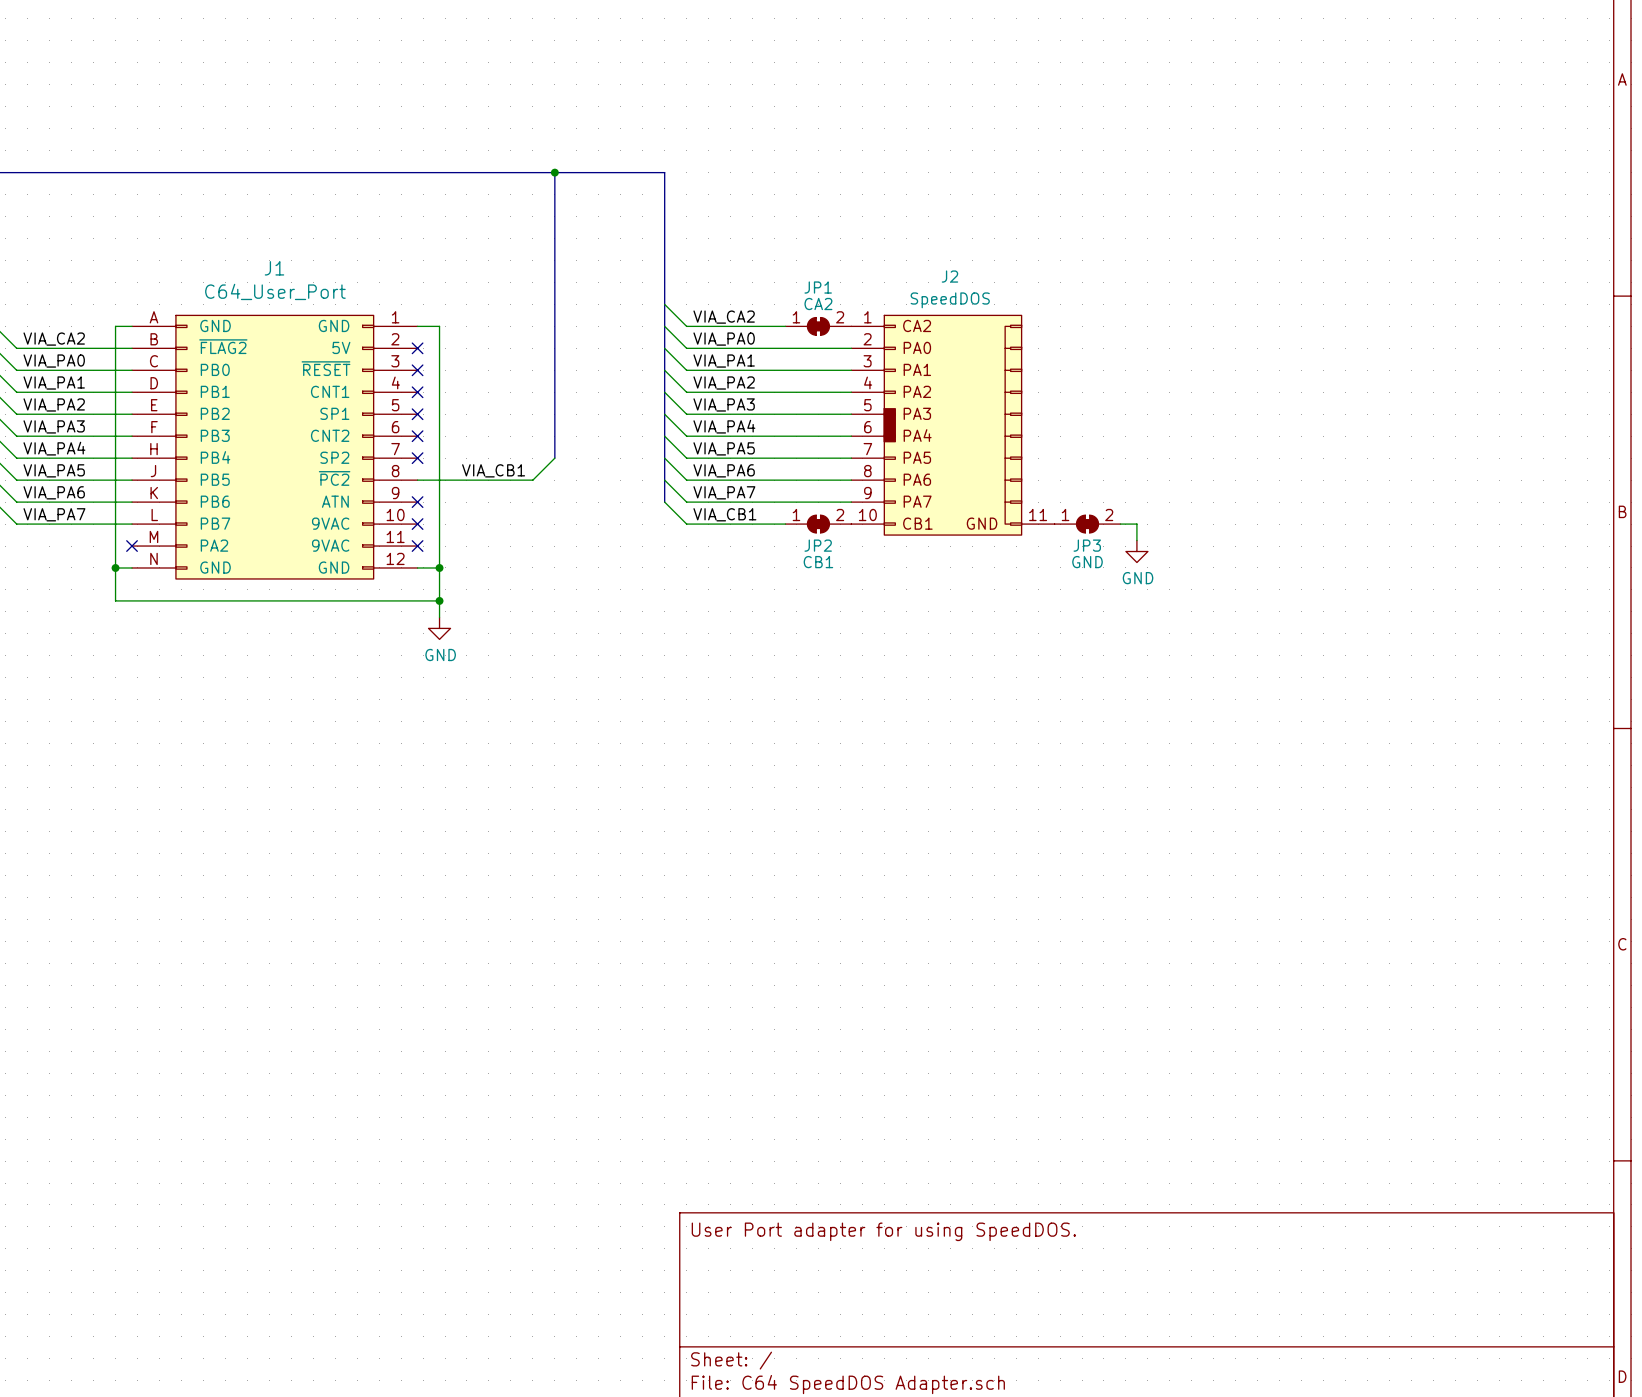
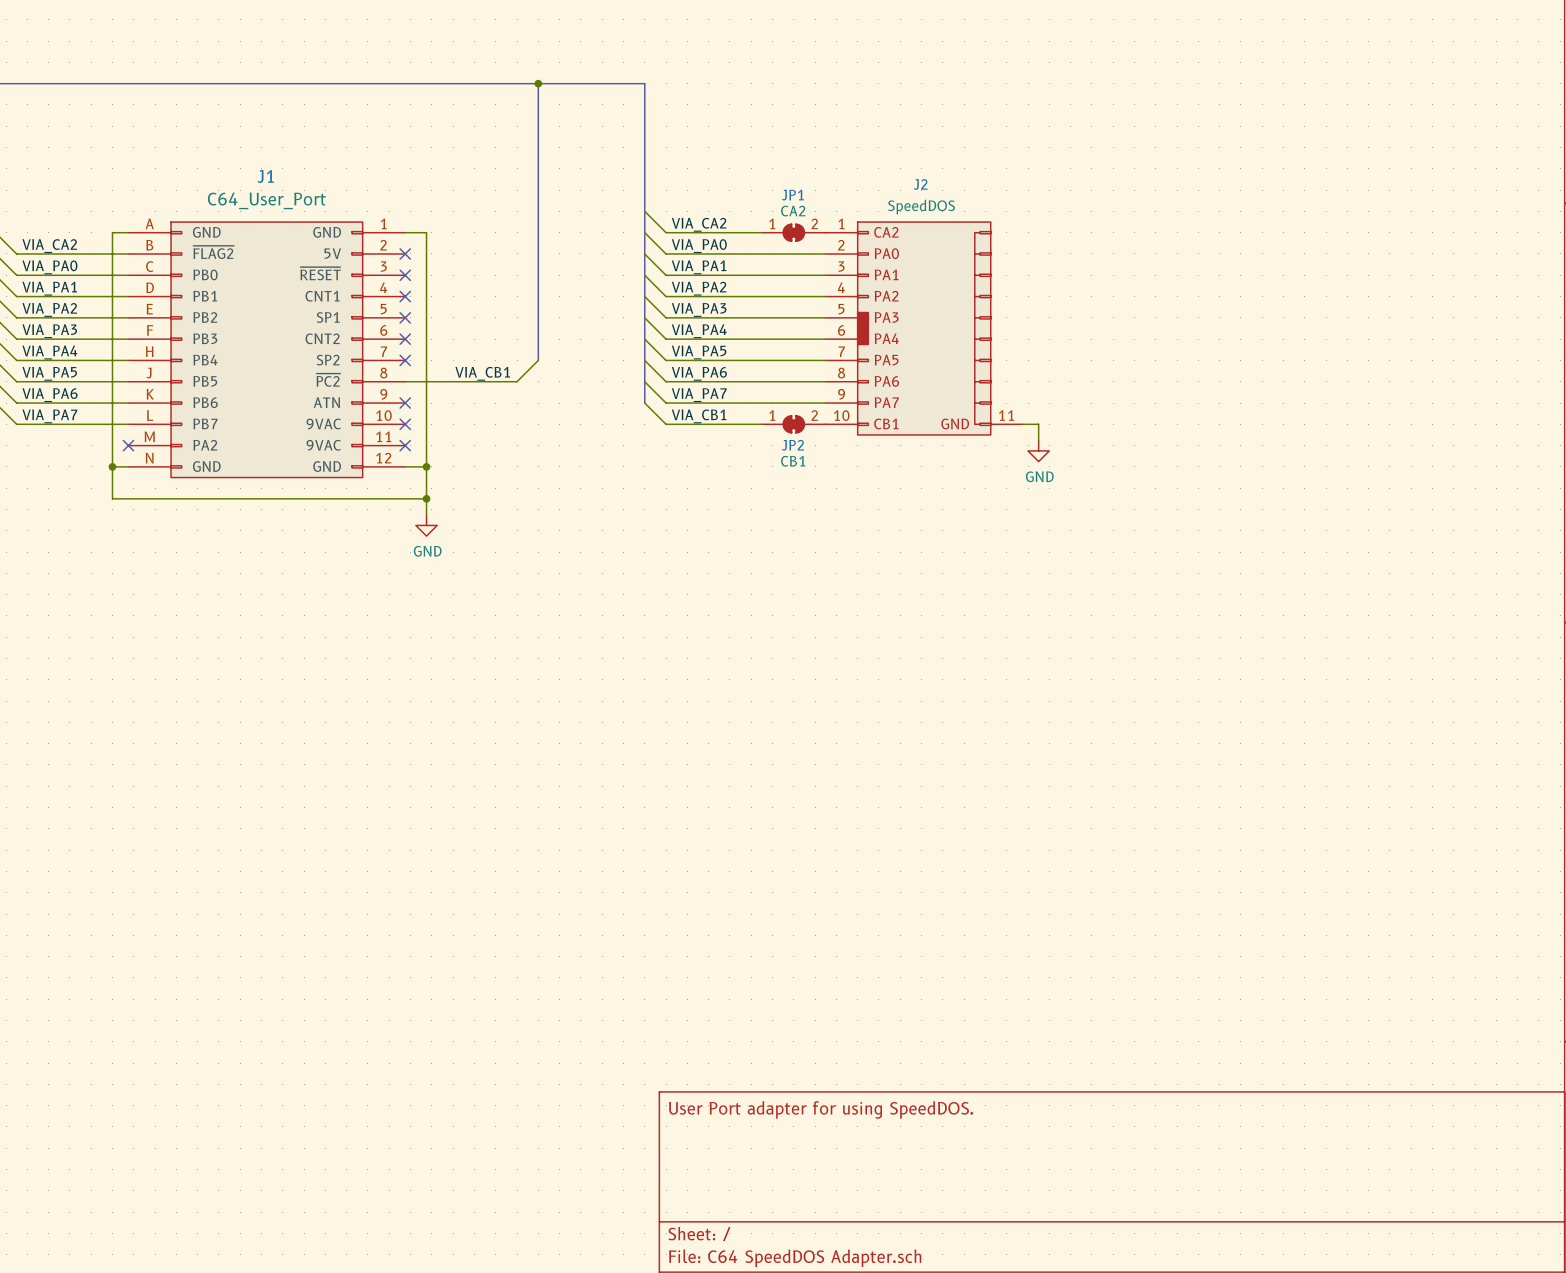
JP3: GND (1087, 524) -> none
wire: (1120, 524) (1136, 524) (1136, 540) -> (1022, 424) (1038, 424) (1038, 440)
power symbol position: GND (1136, 551) -> GND (1038, 450)

